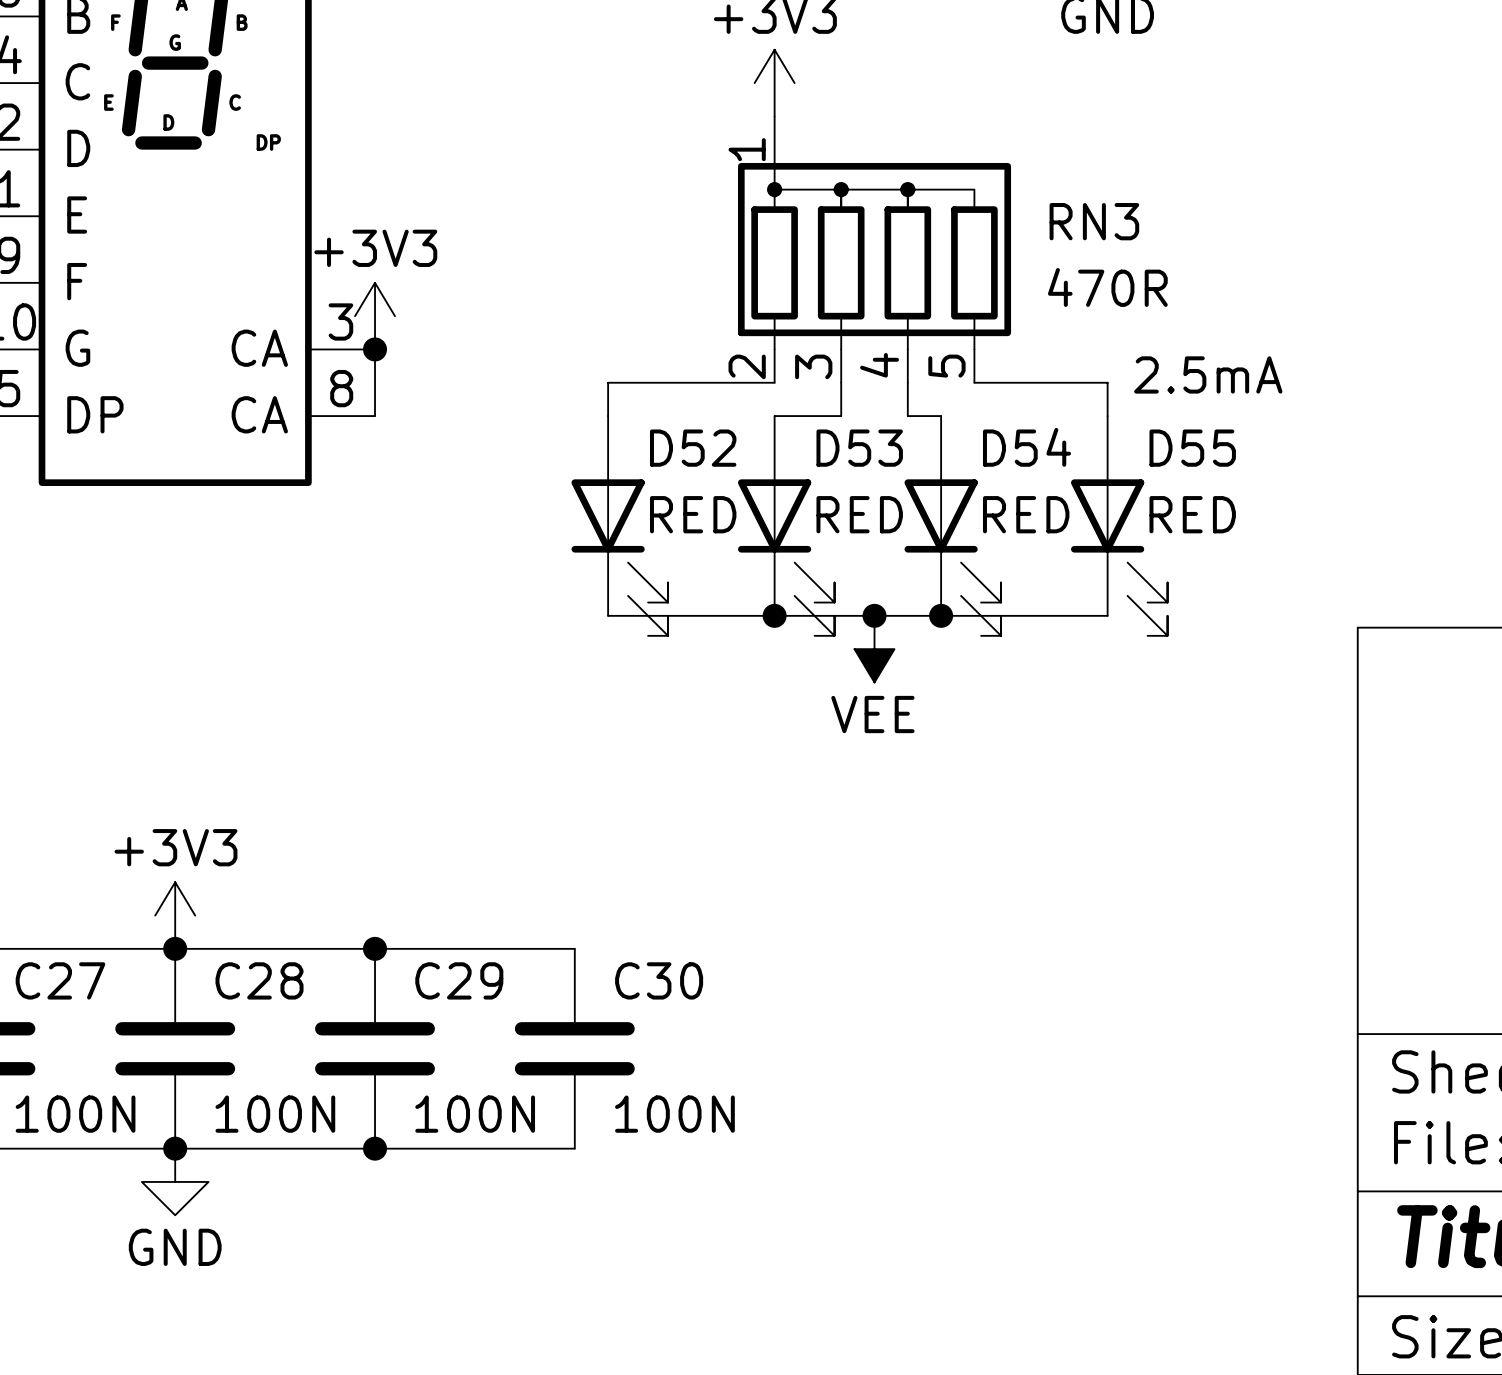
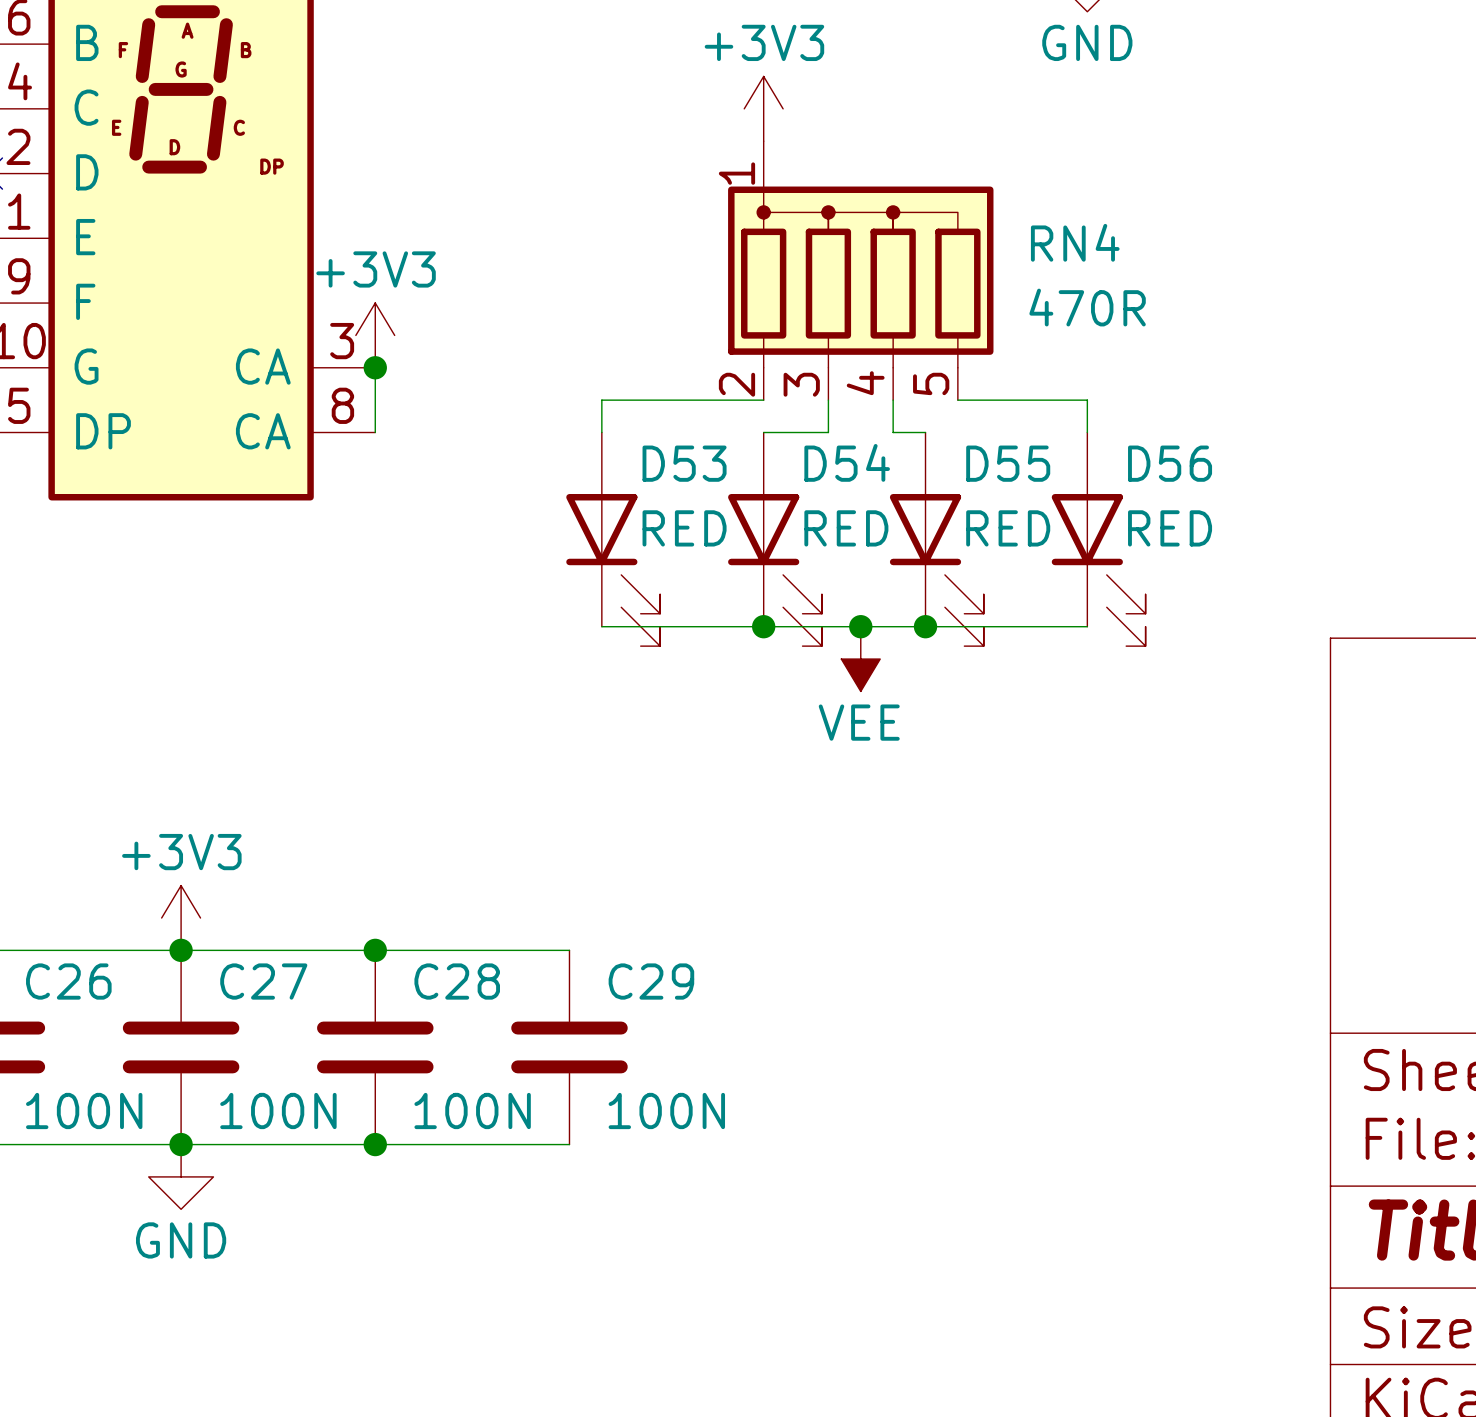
RN3 name: RN3 (1094, 221) -> RN4 (1075, 242)
text: 2.5mA (1208, 374) -> none
D54 name: D54 (1026, 447) -> D55 (1008, 463)
D52 name: D52 (693, 448) -> D53 (684, 463)
D53 name: D53 (859, 448) -> D54 (847, 462)
D55 name: D55 (1192, 448) -> D56 (1170, 463)
C27 name: C27 (60, 980) -> C26 (68, 981)
C28 name: C28 (259, 980) -> C27 (263, 981)
C29 name: C29 (459, 980) -> C28 (457, 981)
C30 name: C30 (659, 980) -> C29 (651, 981)

